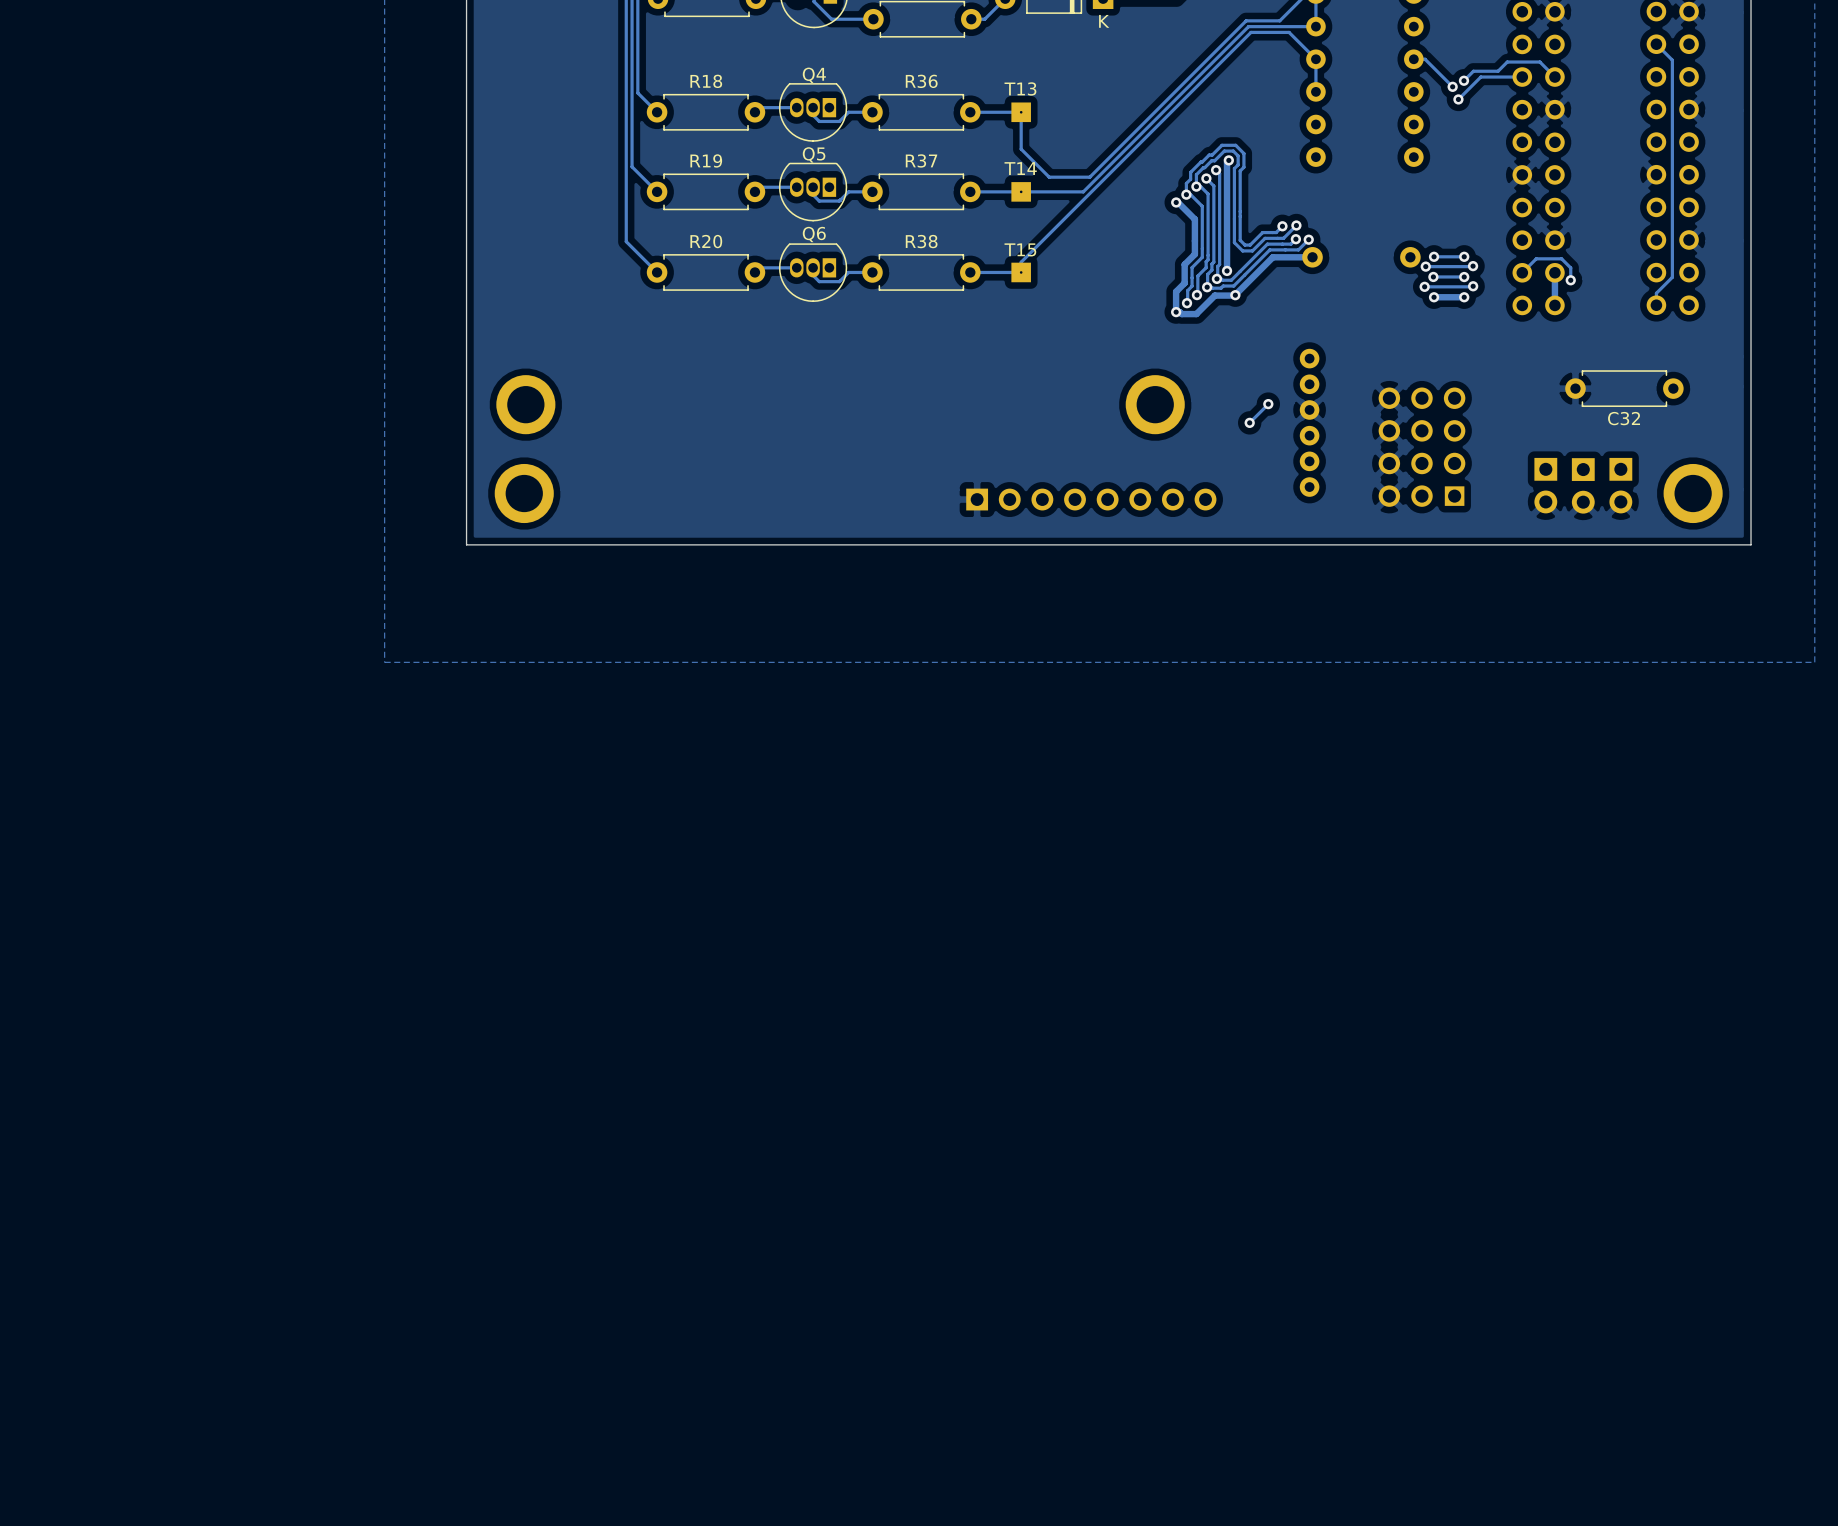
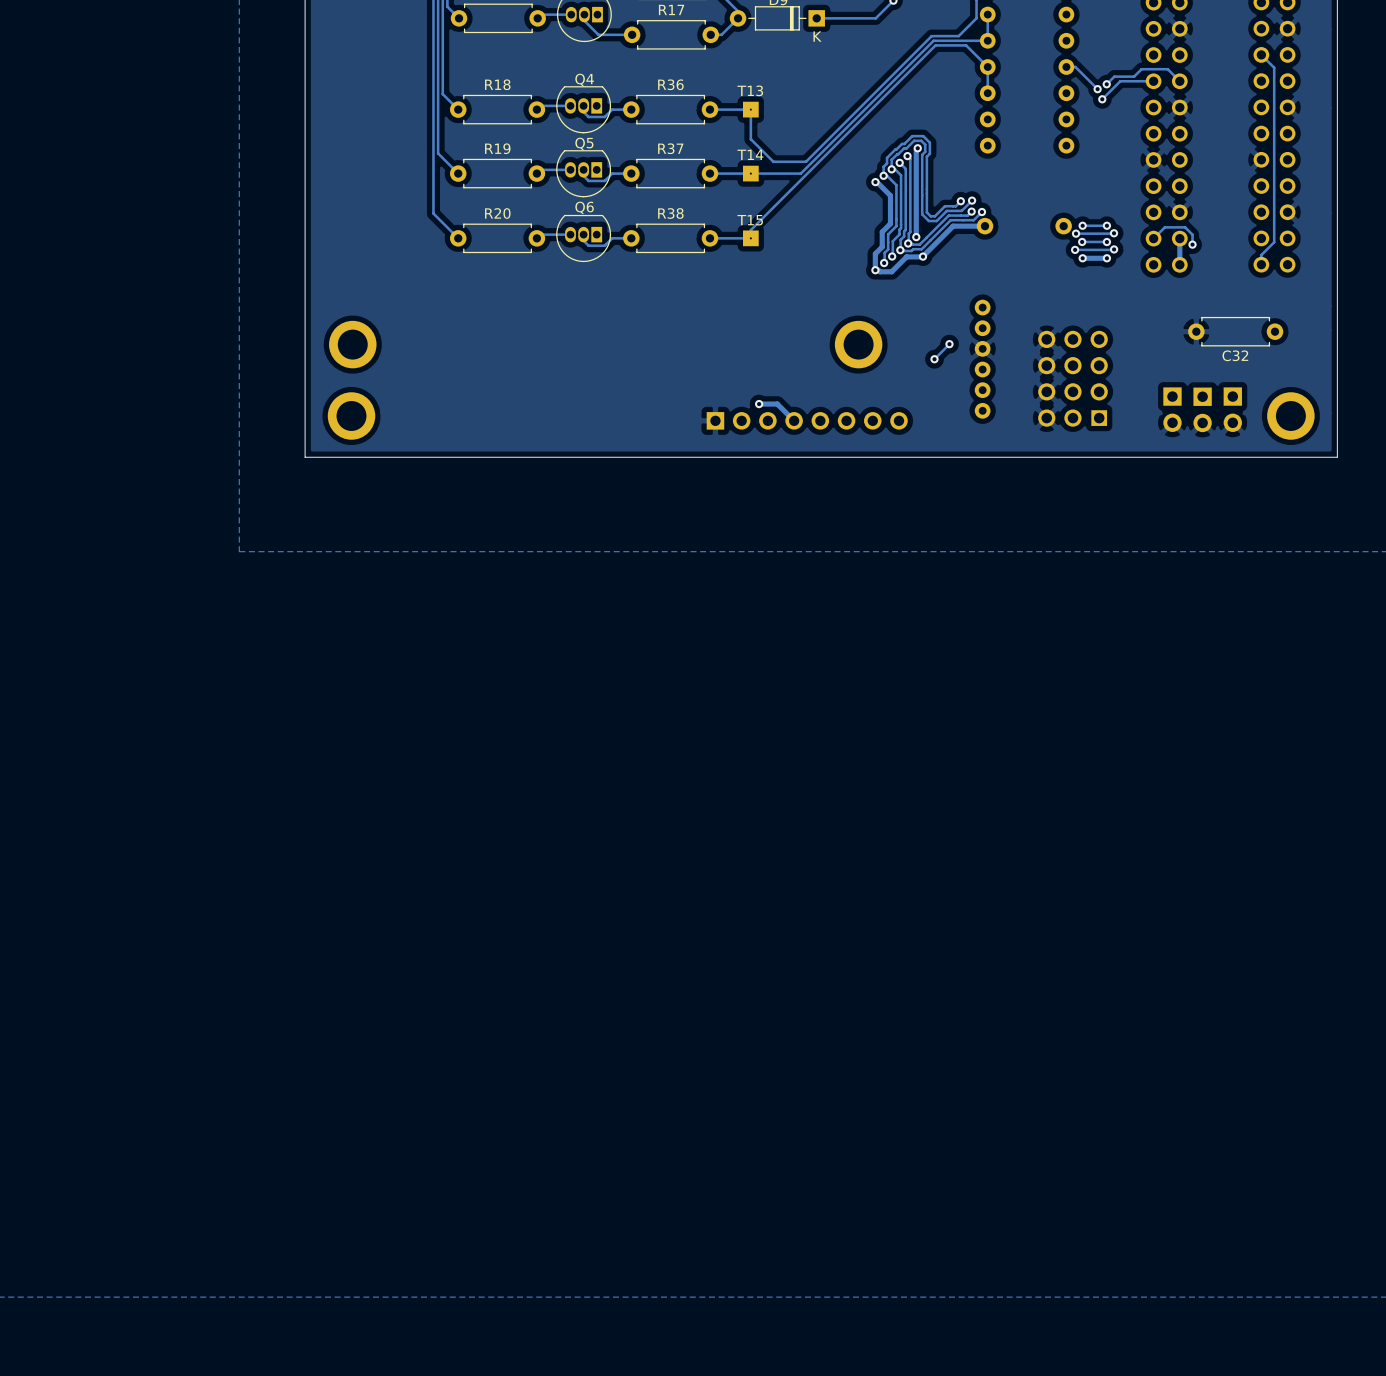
track: none -> (759, 404) (777, 404) (794, 420)
via: none -> (759, 404)

